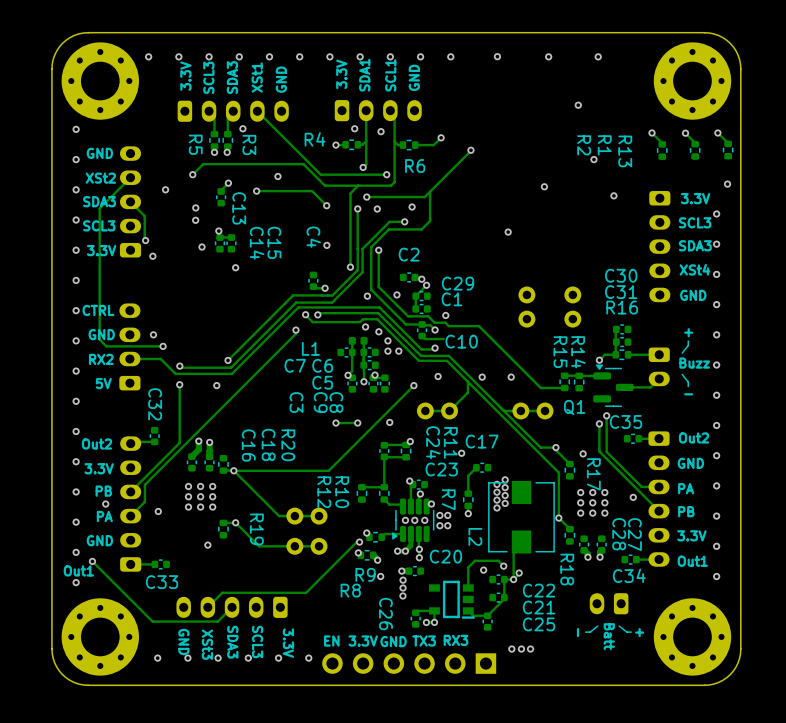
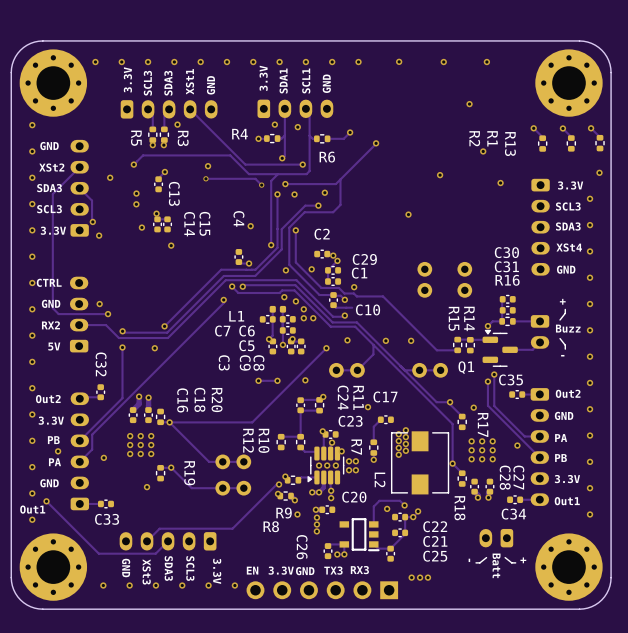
track: (256, 191) (312, 191) (326, 205) -> none
via: (256, 191) -> none
track: none -> (205, 178) (255, 178) (261, 185)
via: none -> (205, 178)
via: none -> (261, 185)
via: (326, 205) -> none
track: (513, 549) (513, 579) -> none

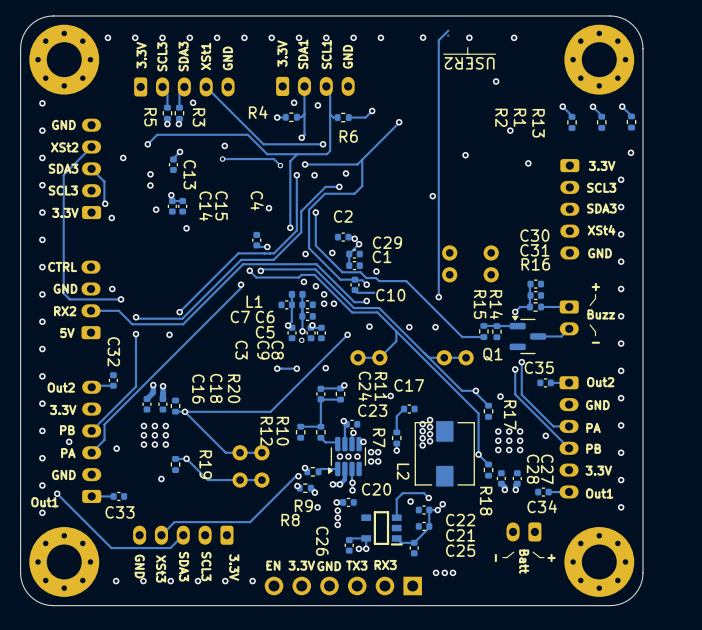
track: none -> (448, 30) (438, 40) (438, 297)
track: none -> (448, 35) (448, 35)
line: none -> (467, 47) (467, 54)
line: none -> (495, 54) (443, 54)
text: none -> USER2 (469, 63)
via: none -> (438, 297)
via: none -> (301, 340)

